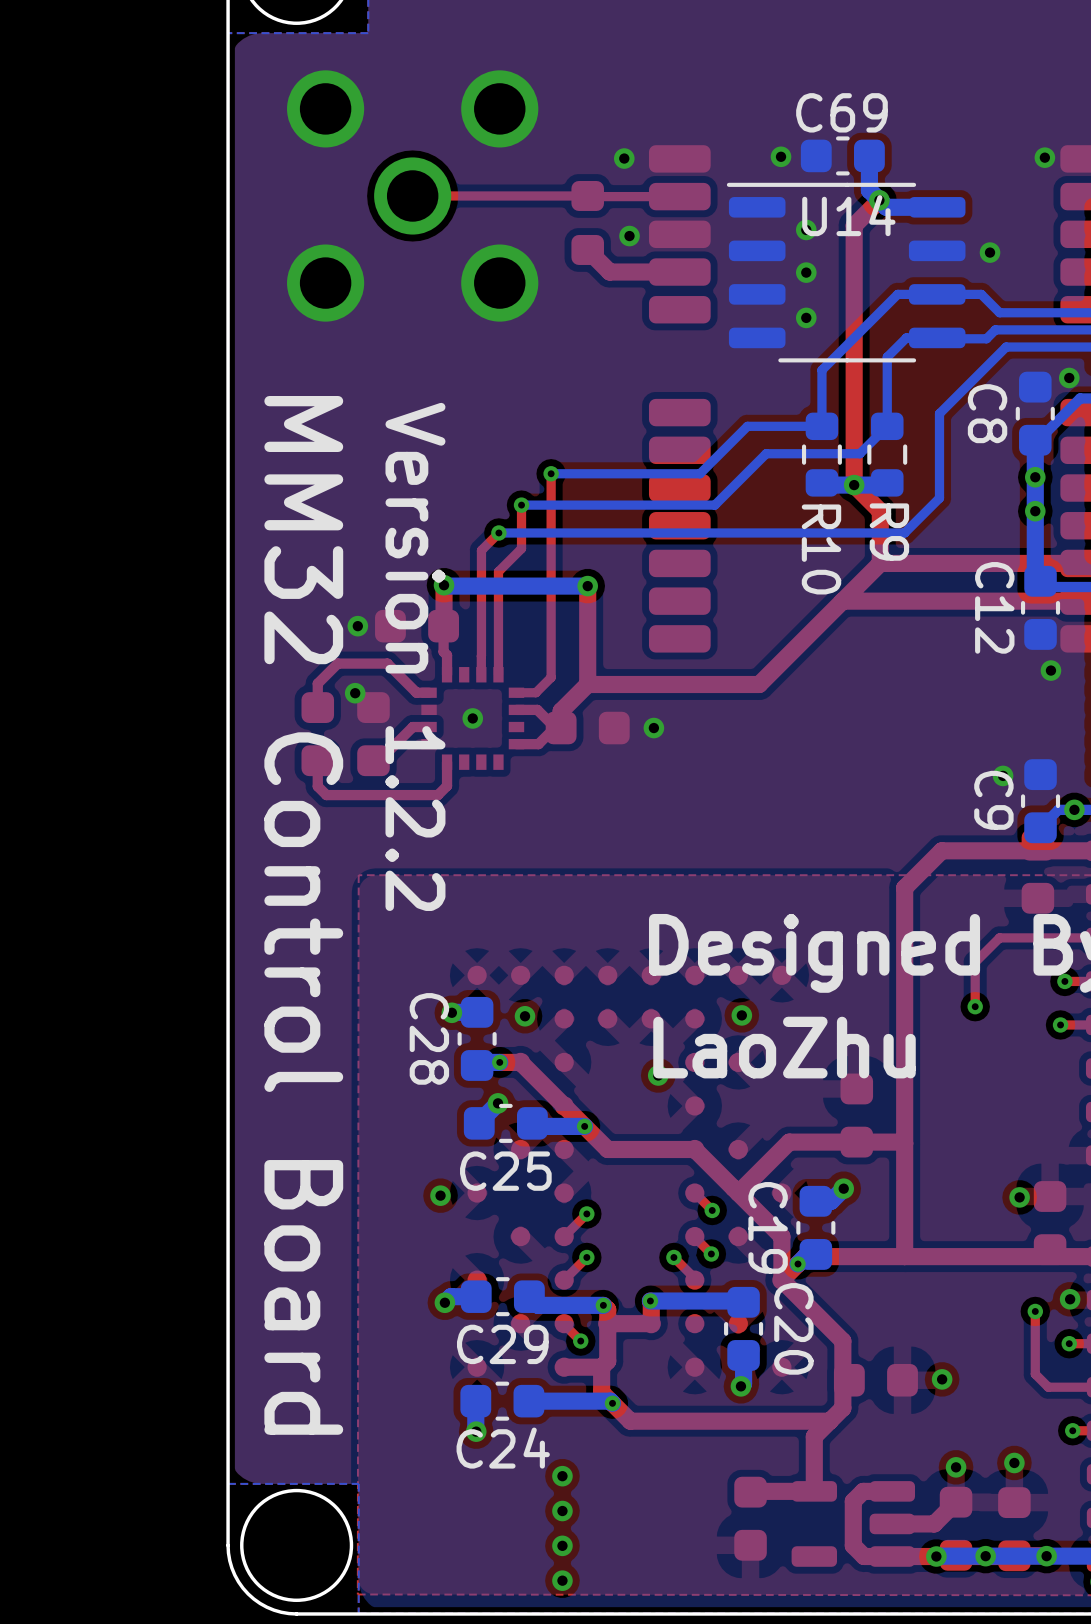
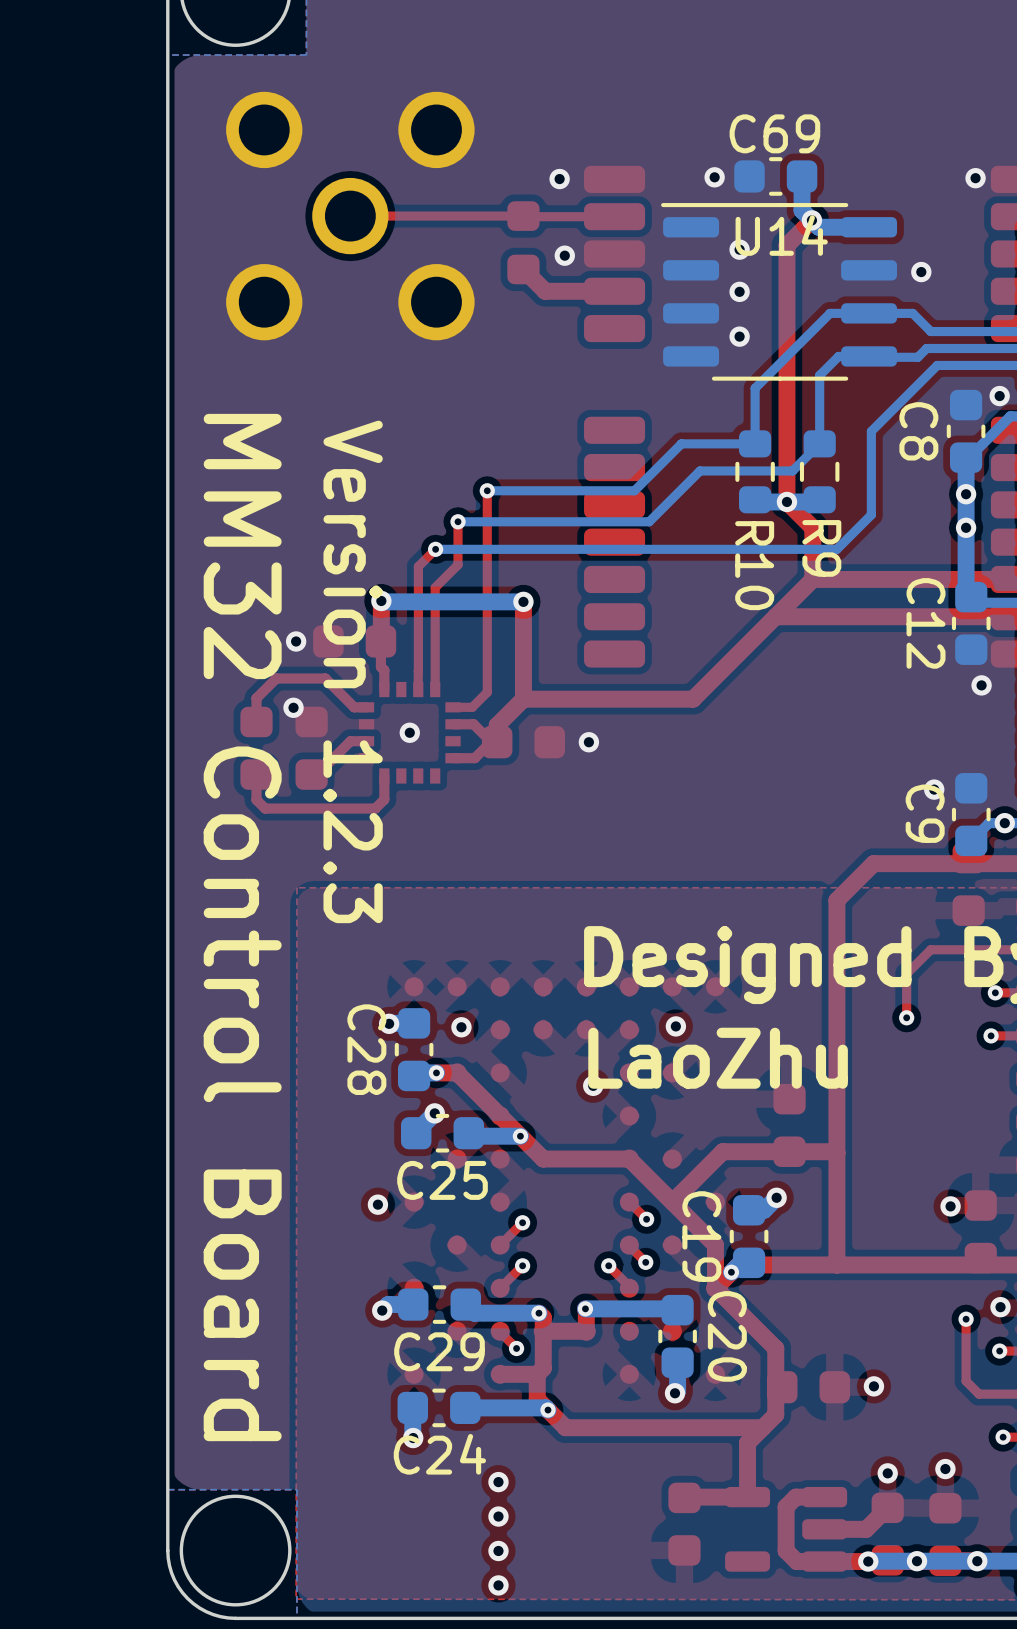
text: Version 1.2.2 (415, 656) -> Version 1.2.3 (353, 671)

